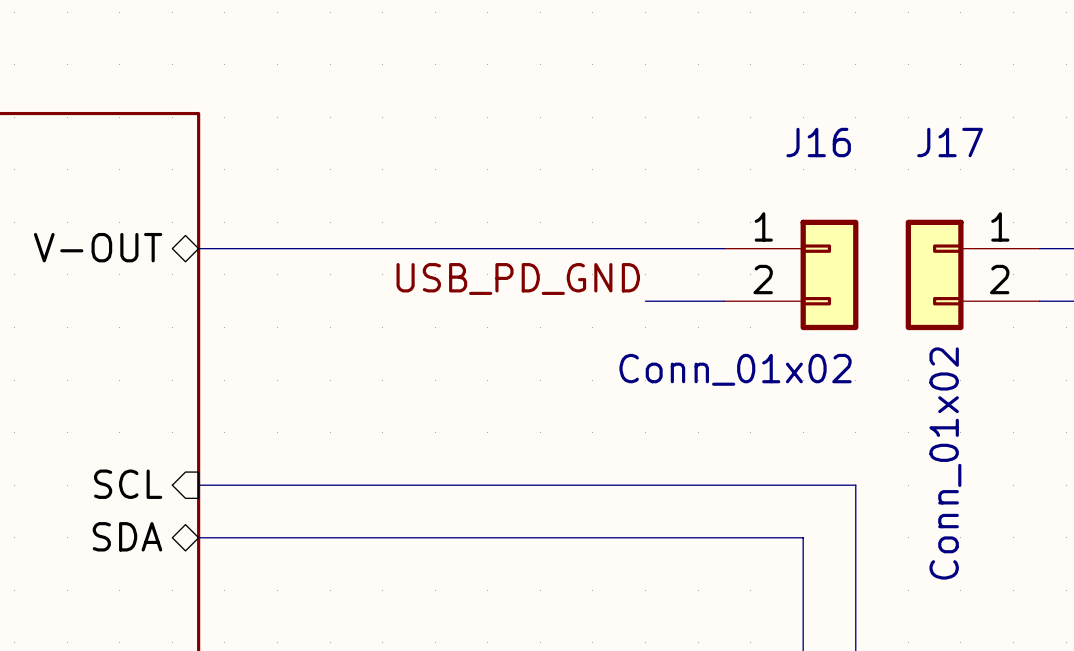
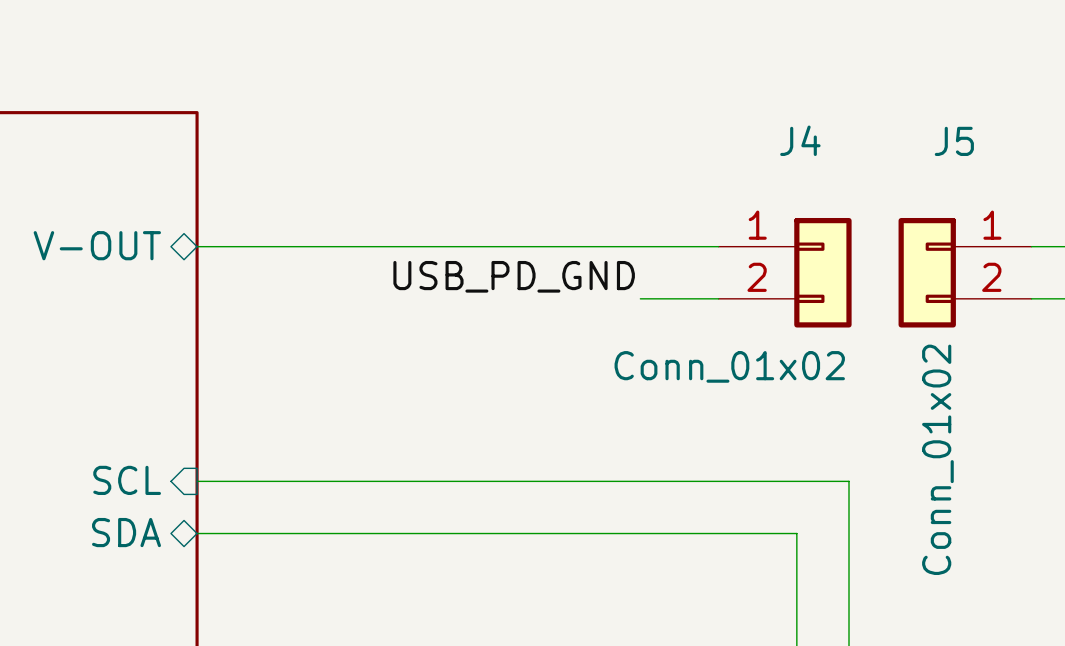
J16 name: J16 (818, 142) -> J4 (800, 140)
J17 name: J17 (950, 142) -> J5 (954, 141)

